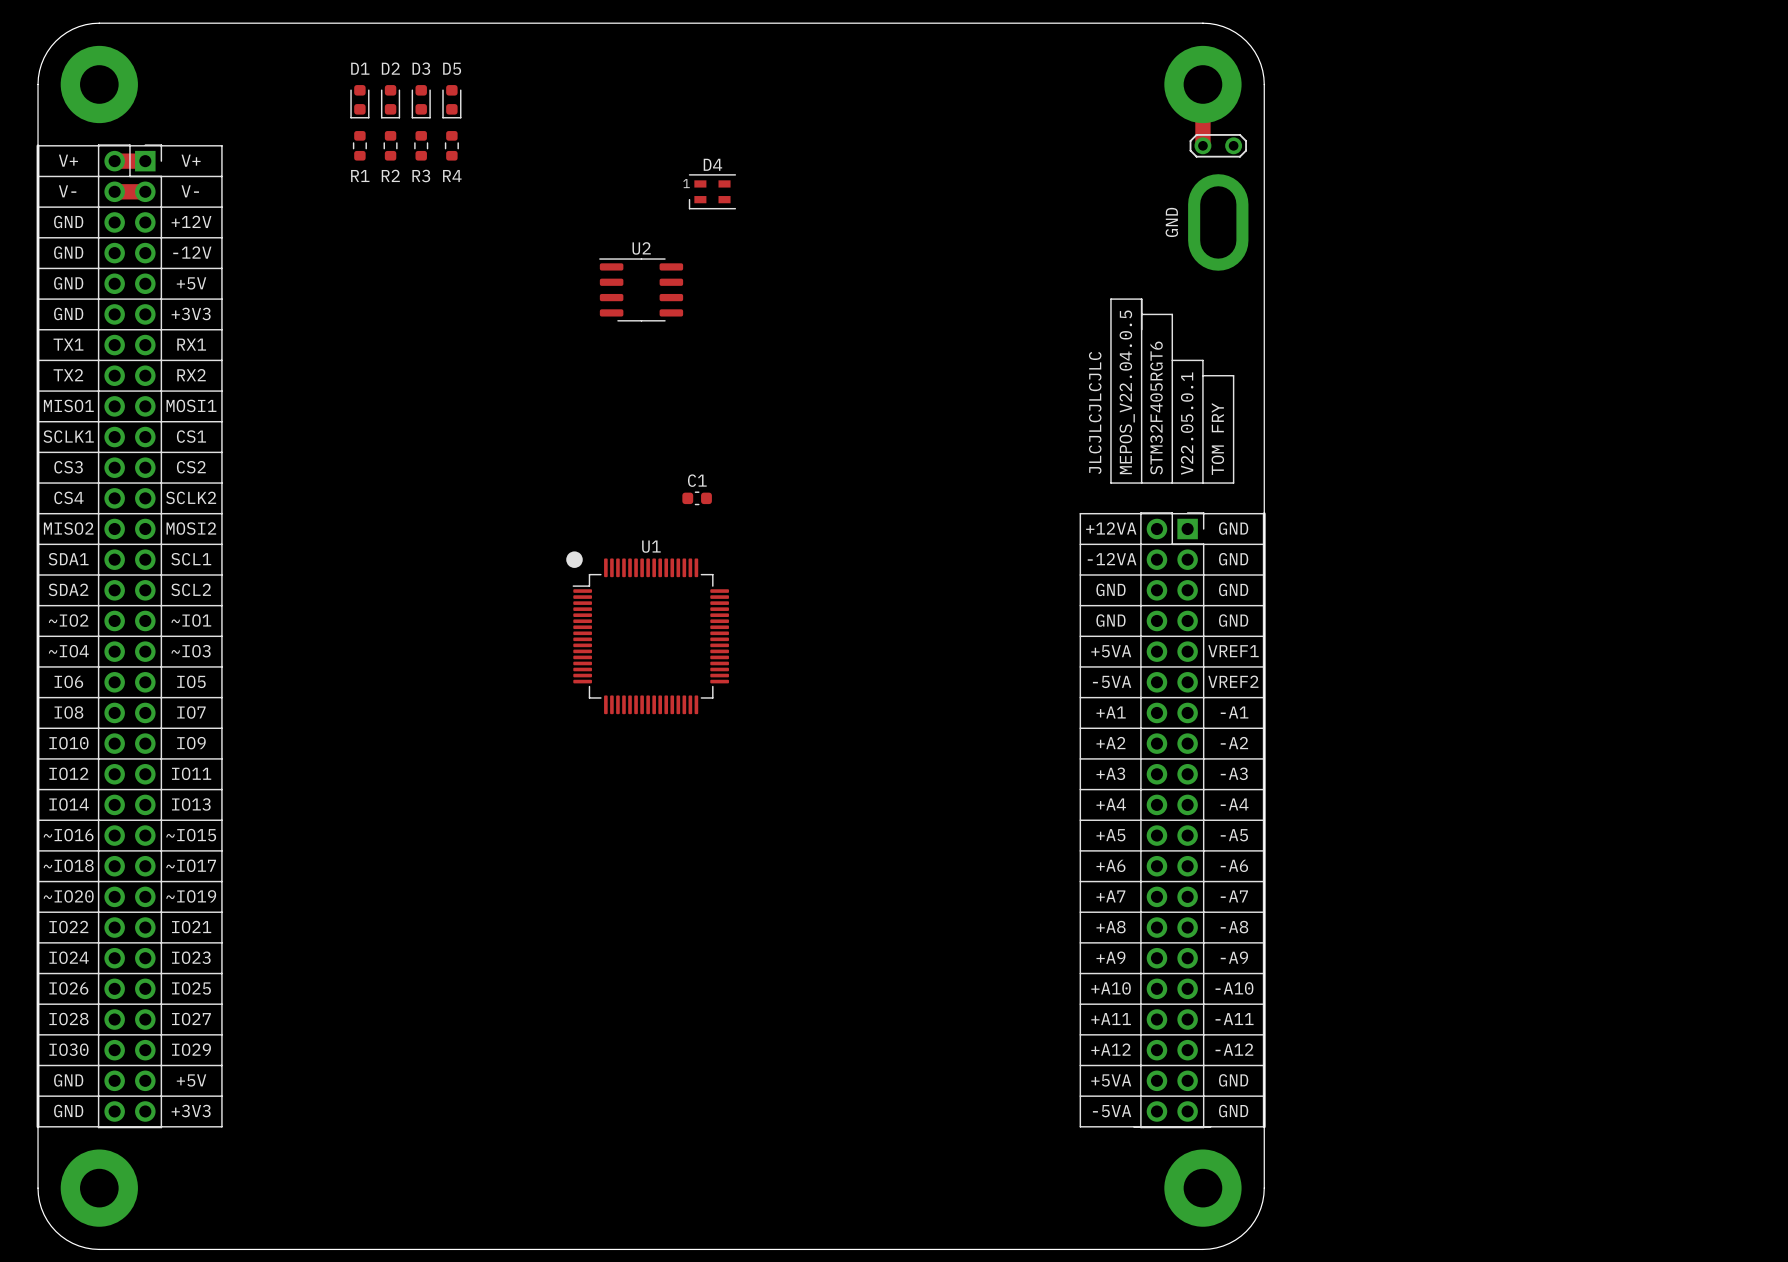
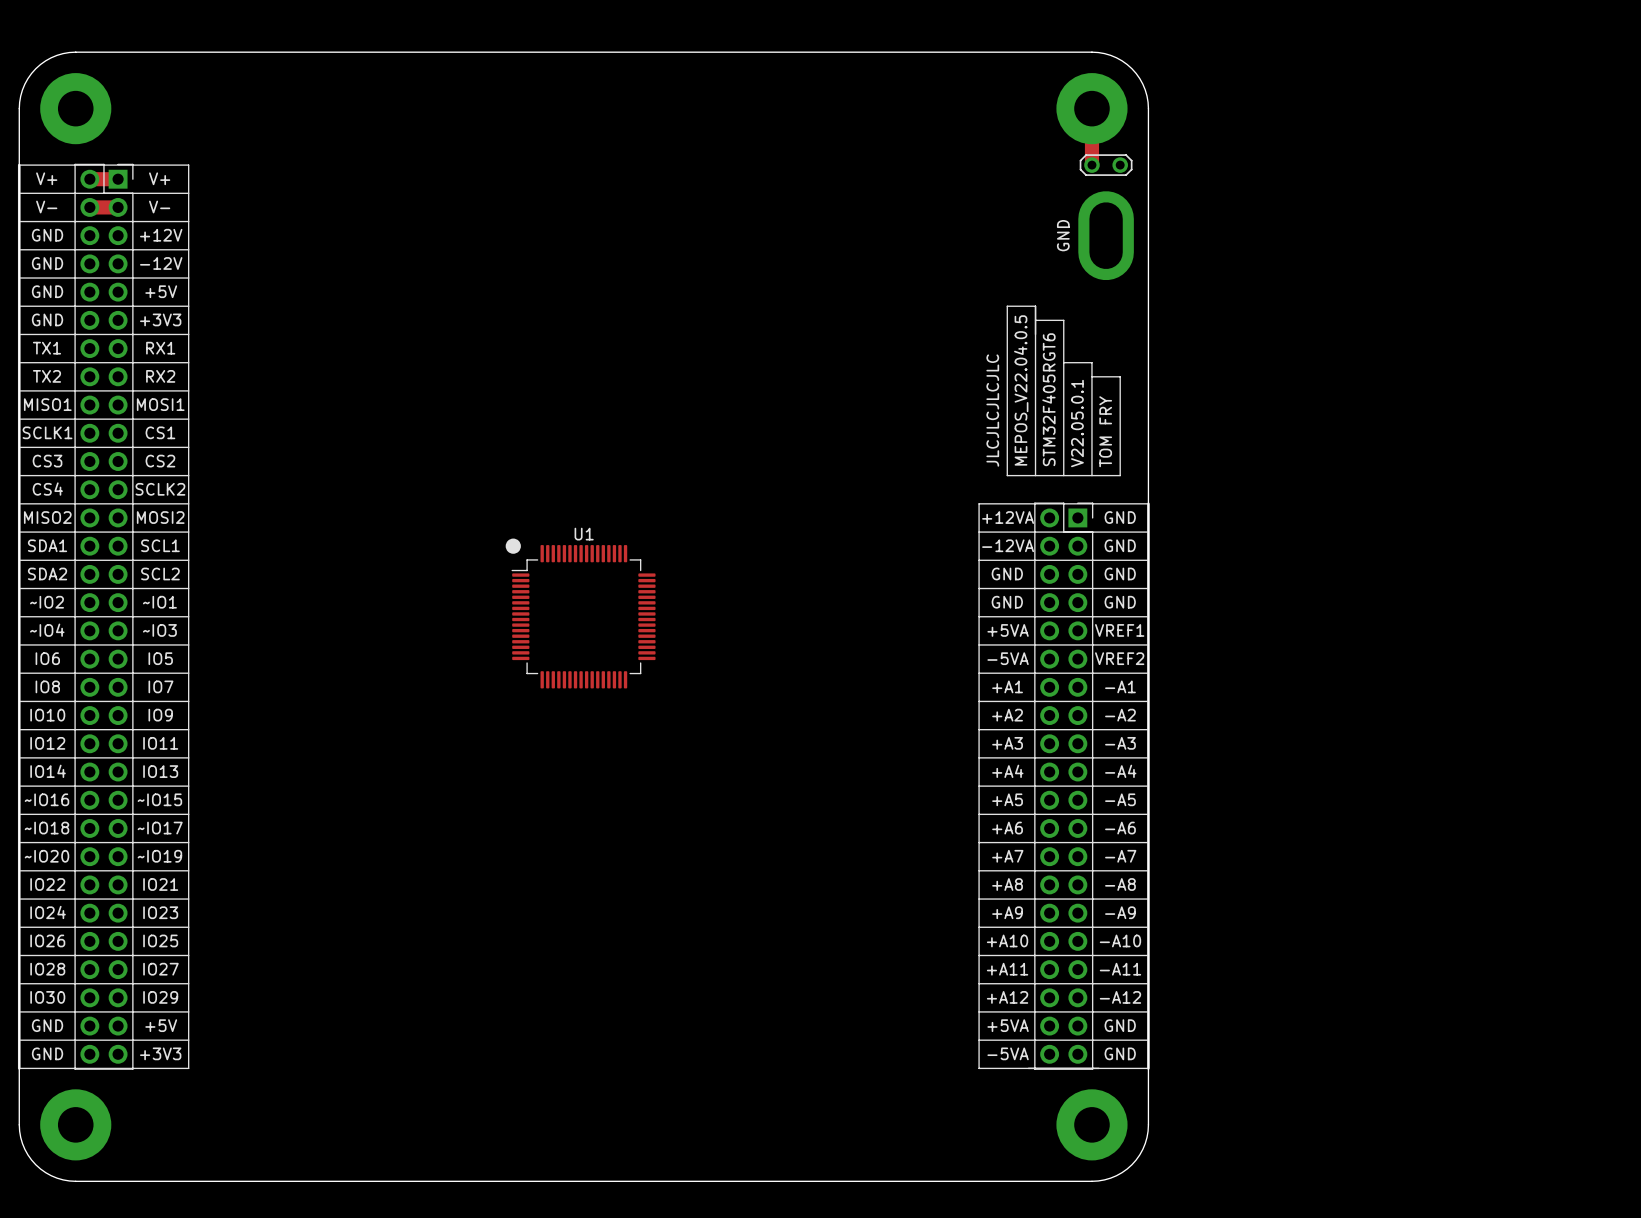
D1: (359, 101) -> none
D2: (390, 101) -> none
D3: (421, 101) -> none
D5: (451, 101) -> none
R1: (359, 145) -> none
R2: (390, 145) -> none
R3: (421, 145) -> none
R4: (451, 145) -> none
D4: (712, 191) -> none
U2: (641, 289) -> none
C1: (697, 498) -> none

